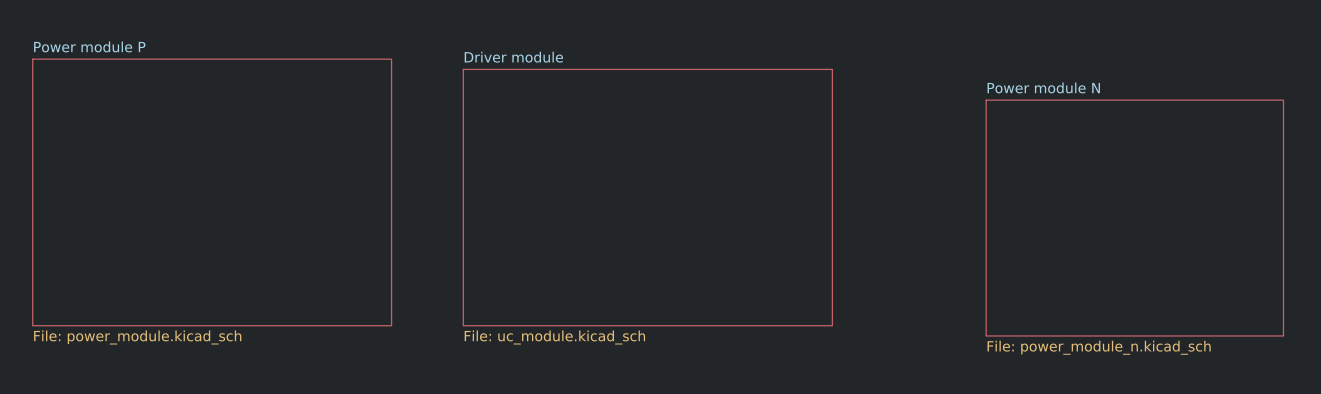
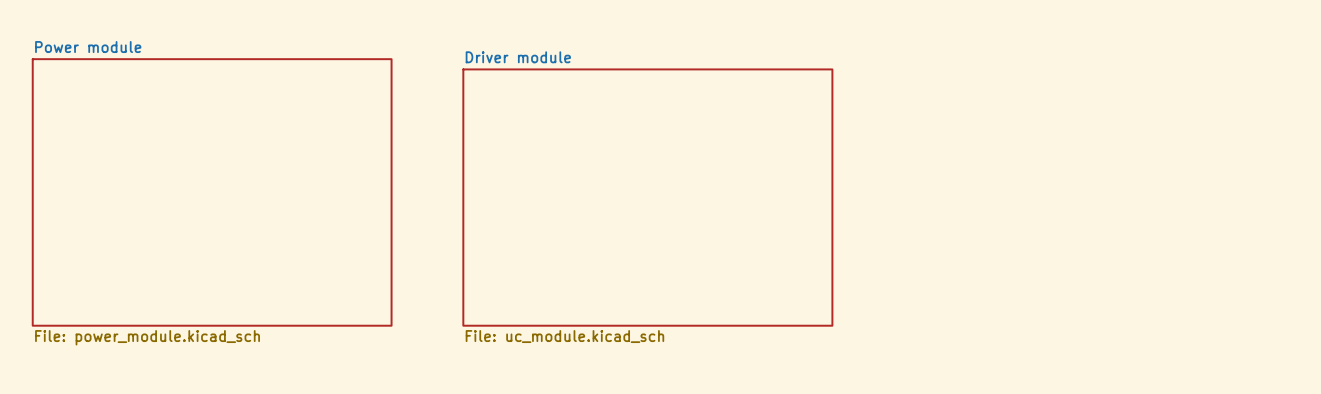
sheet Power module P name: Power module P (89, 46) -> Power module (88, 47)
sheet Power module N: File: power_module_n.kicad_sch (1134, 218) -> none

